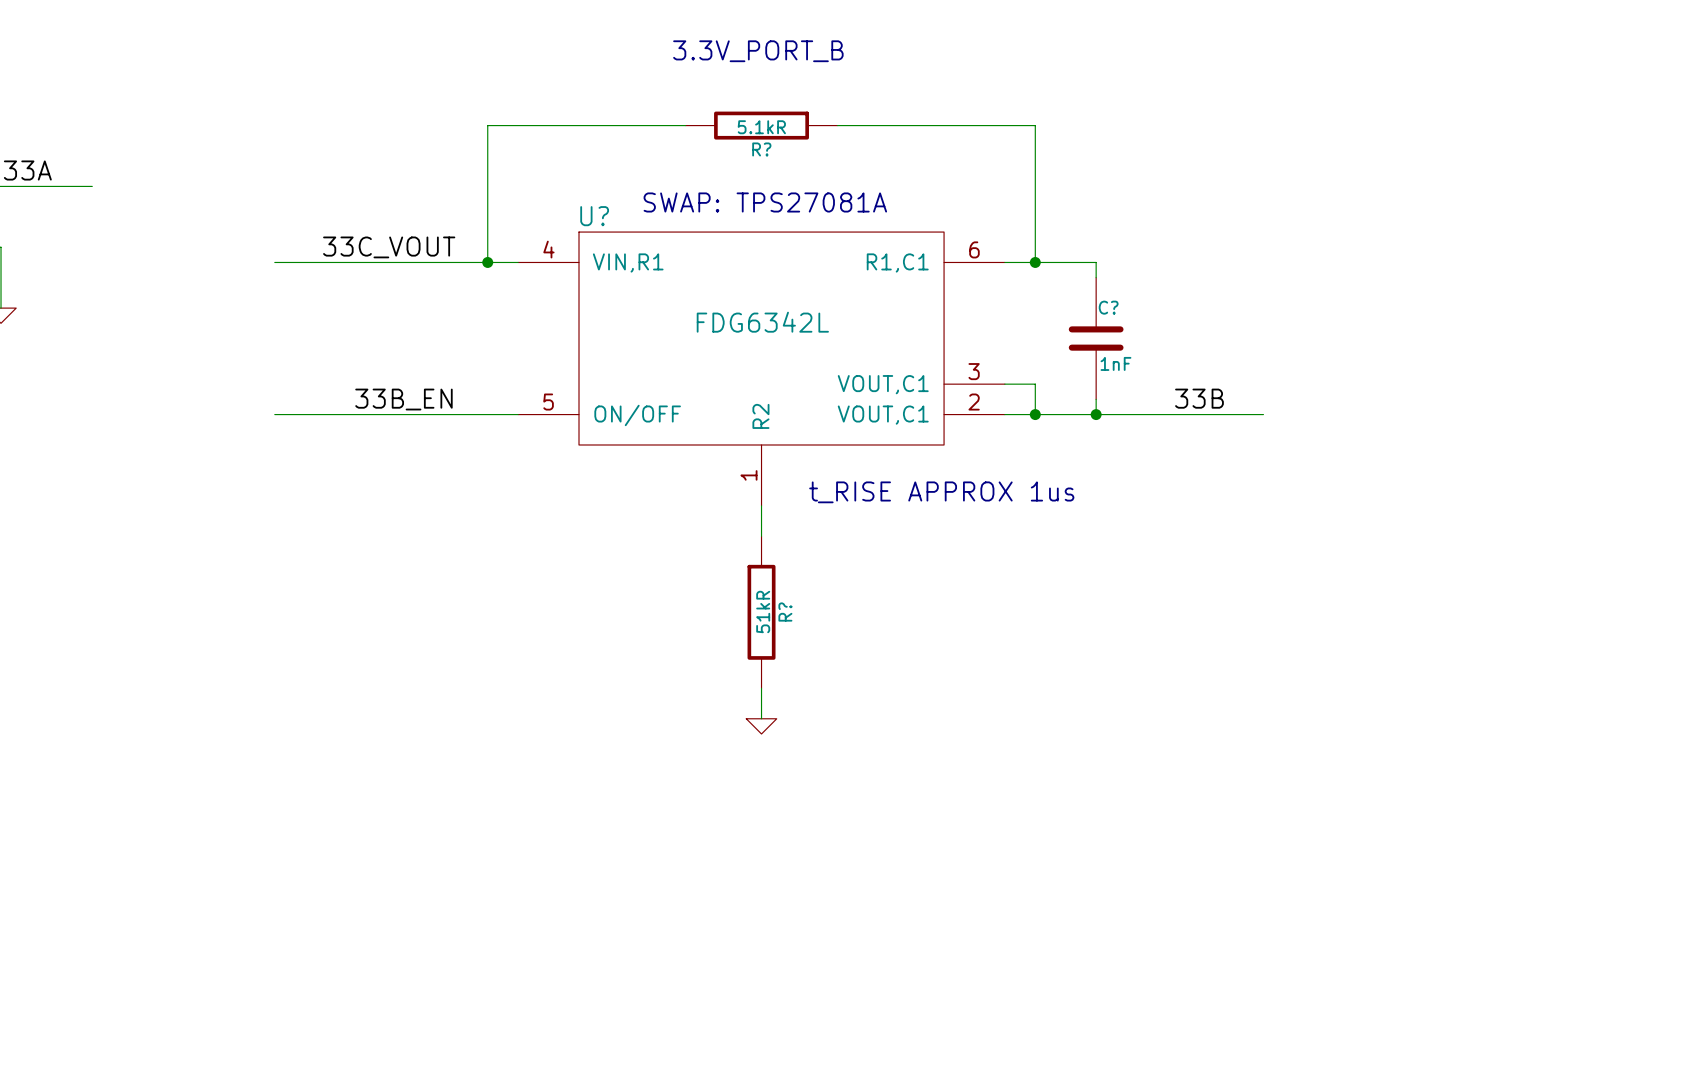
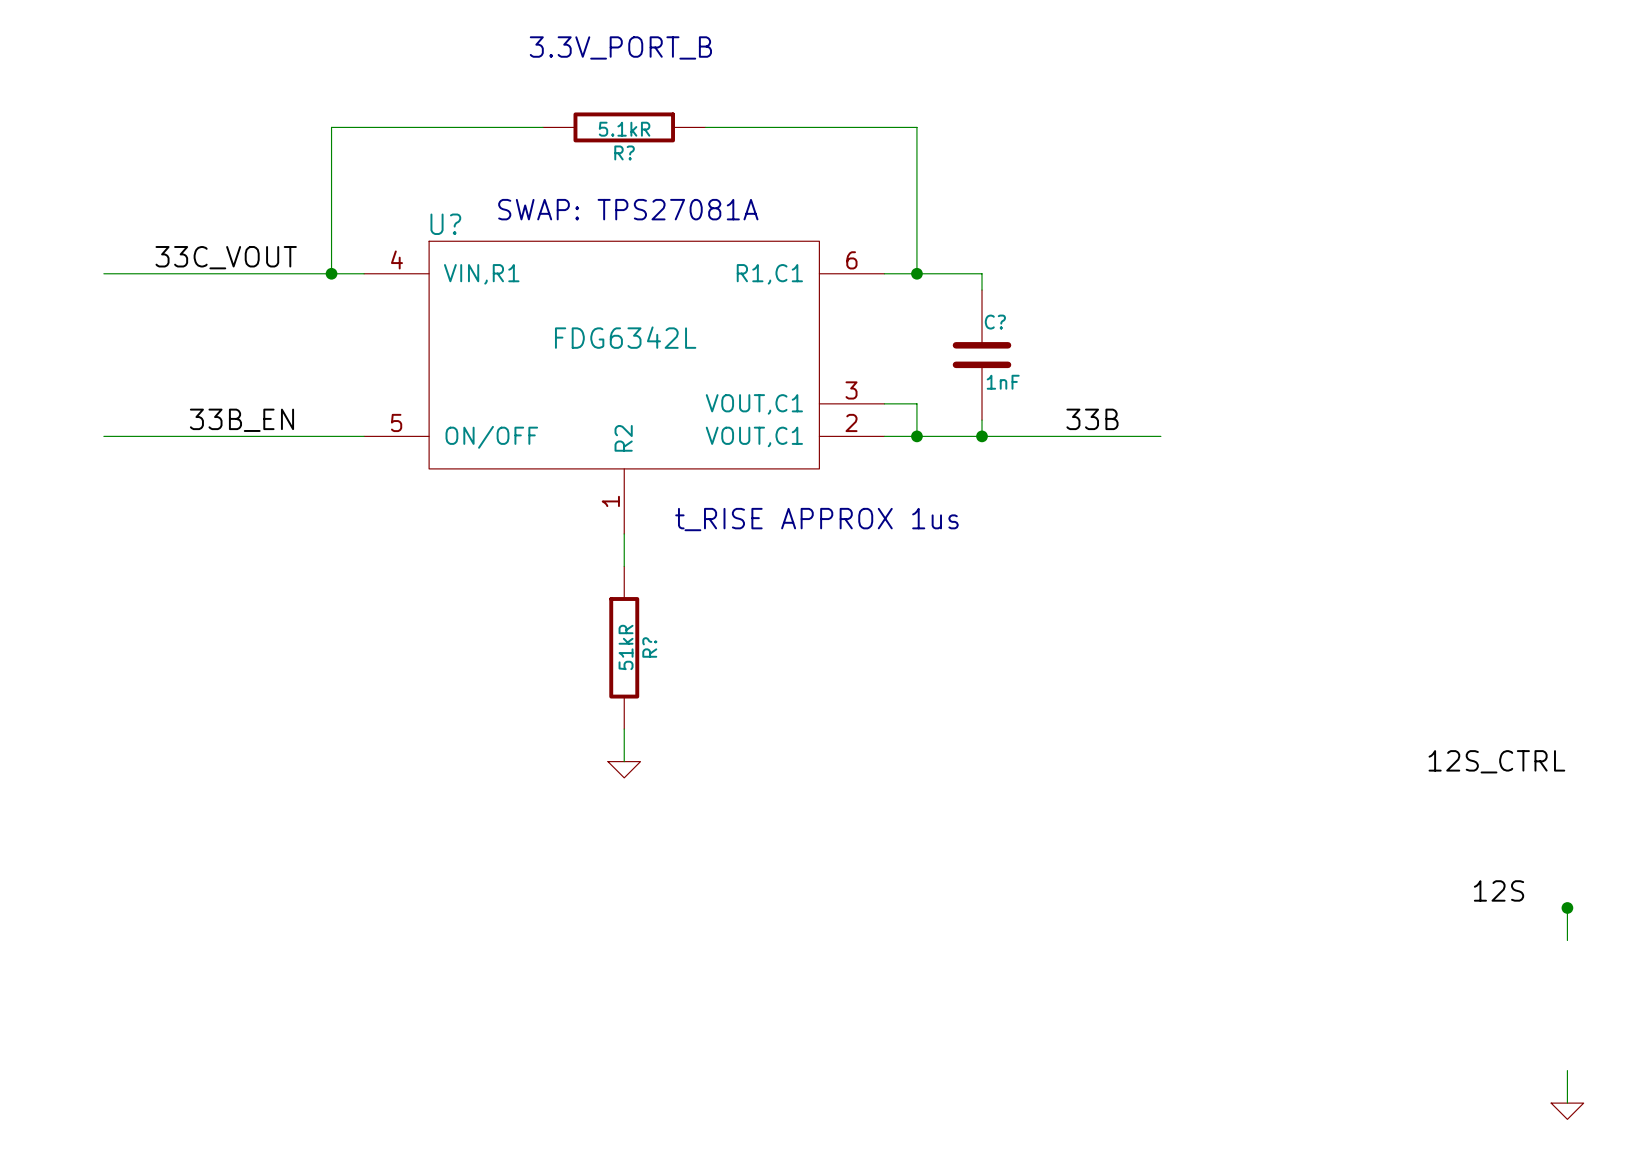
label: none -> 12S_CTRL (1496, 761)
label: none -> 12S (1499, 890)
wire: none -> (1567, 907) (1567, 940)
junction: none -> (1567, 907)
wire: none -> (1567, 1070) (1567, 1103)
power symbol: none -> (1567, 1111)

